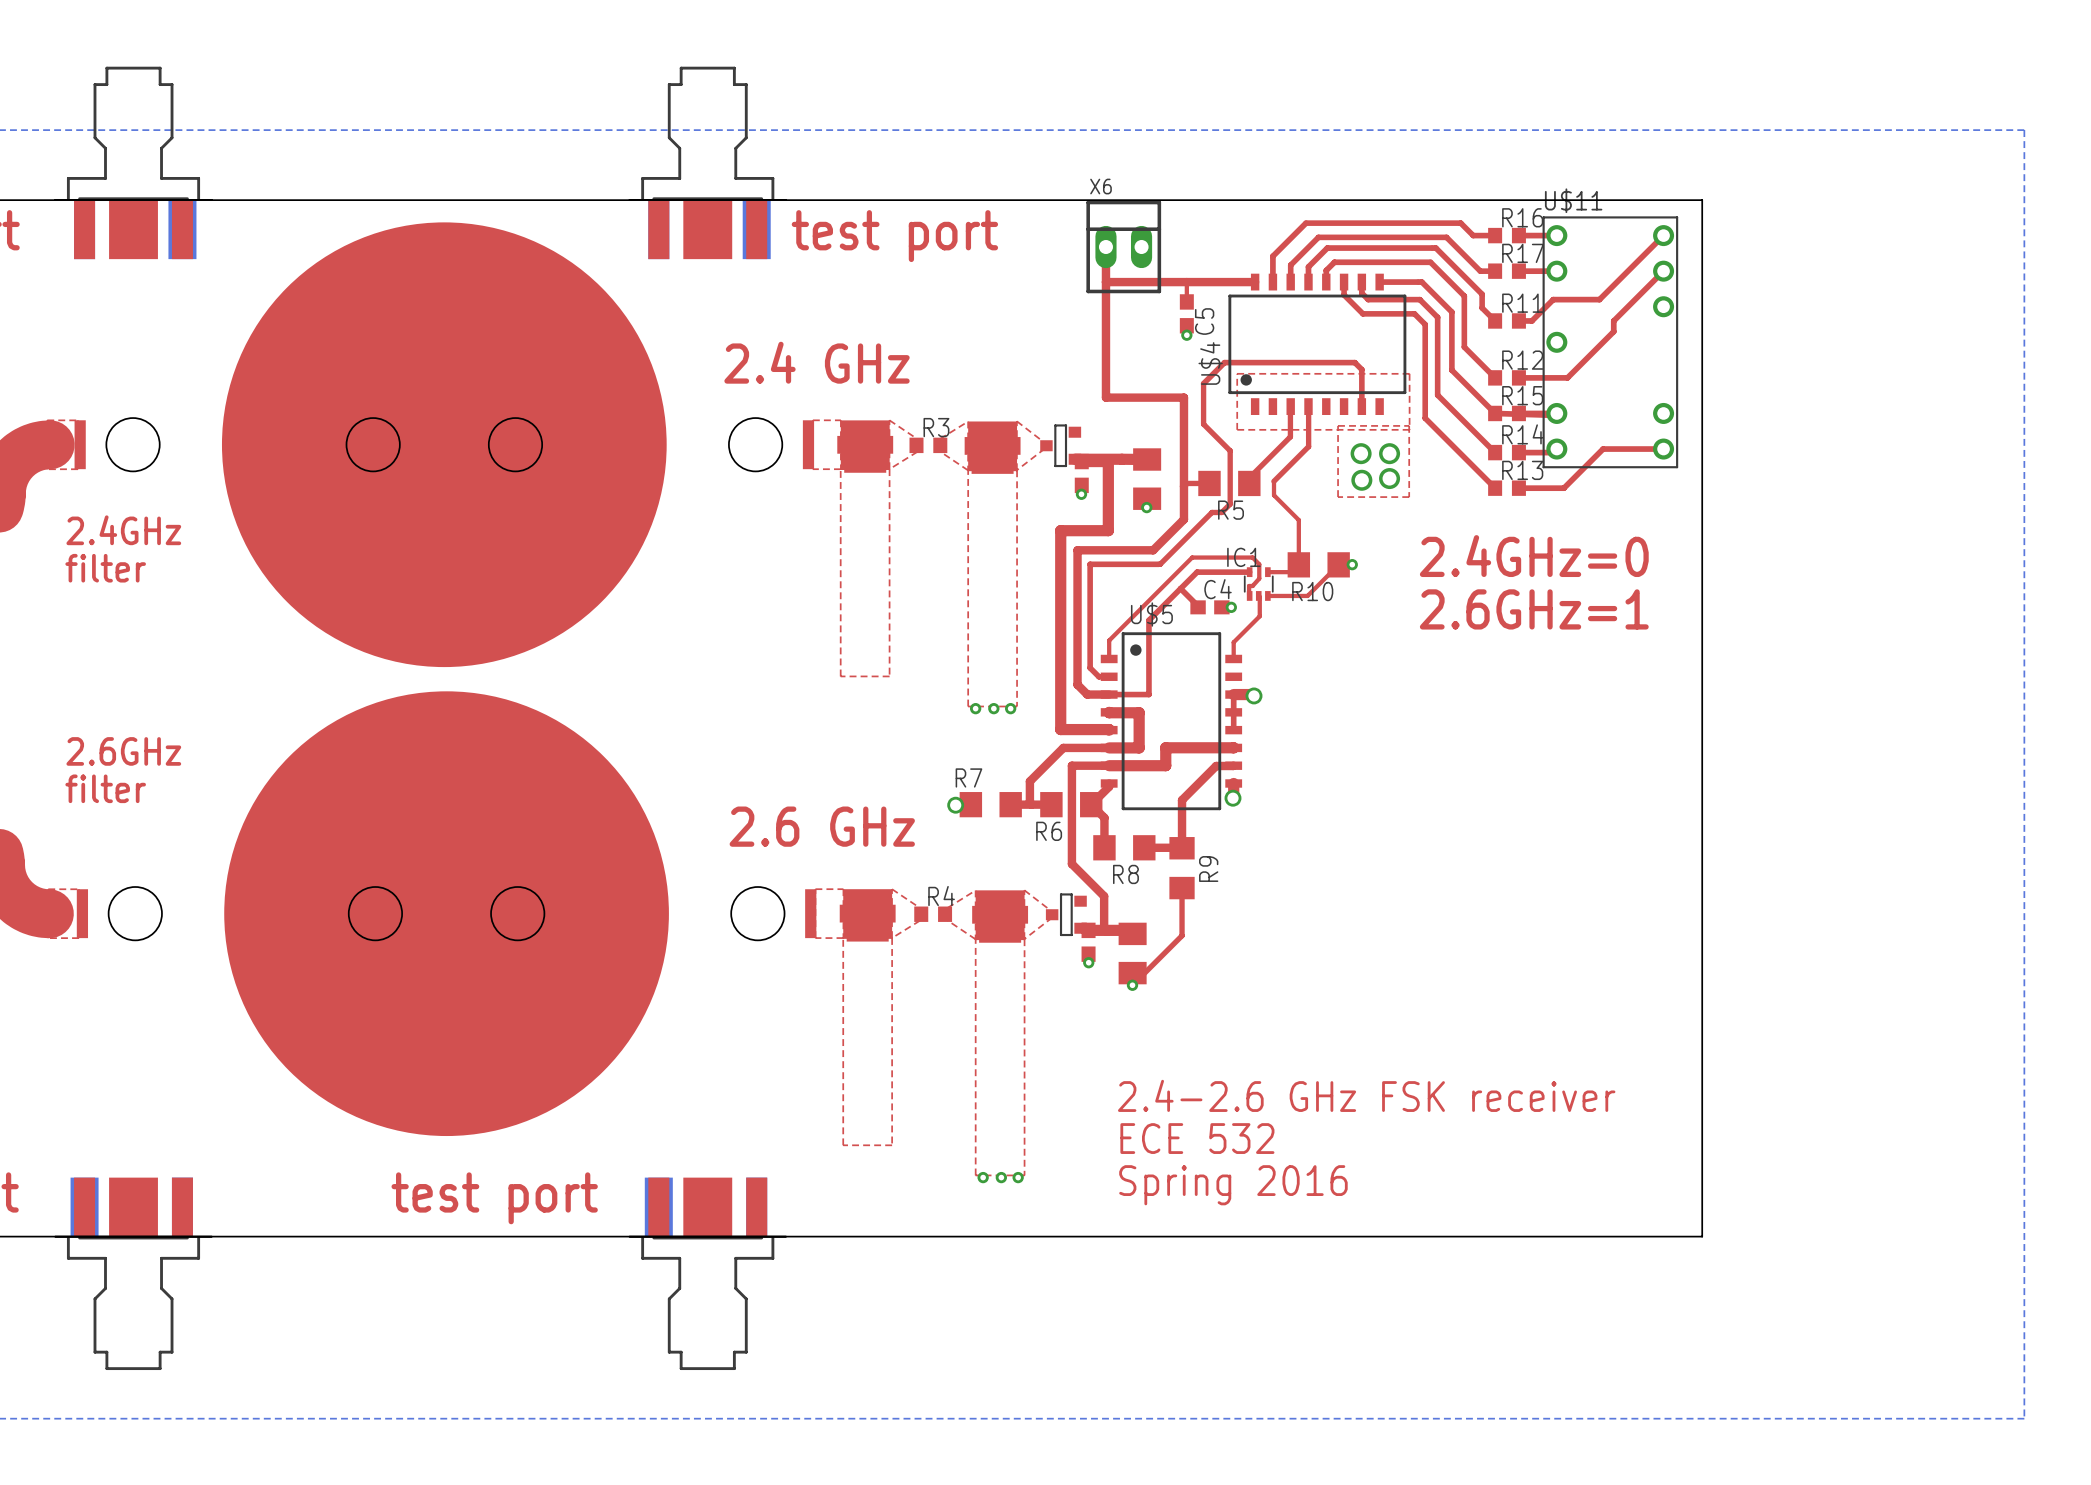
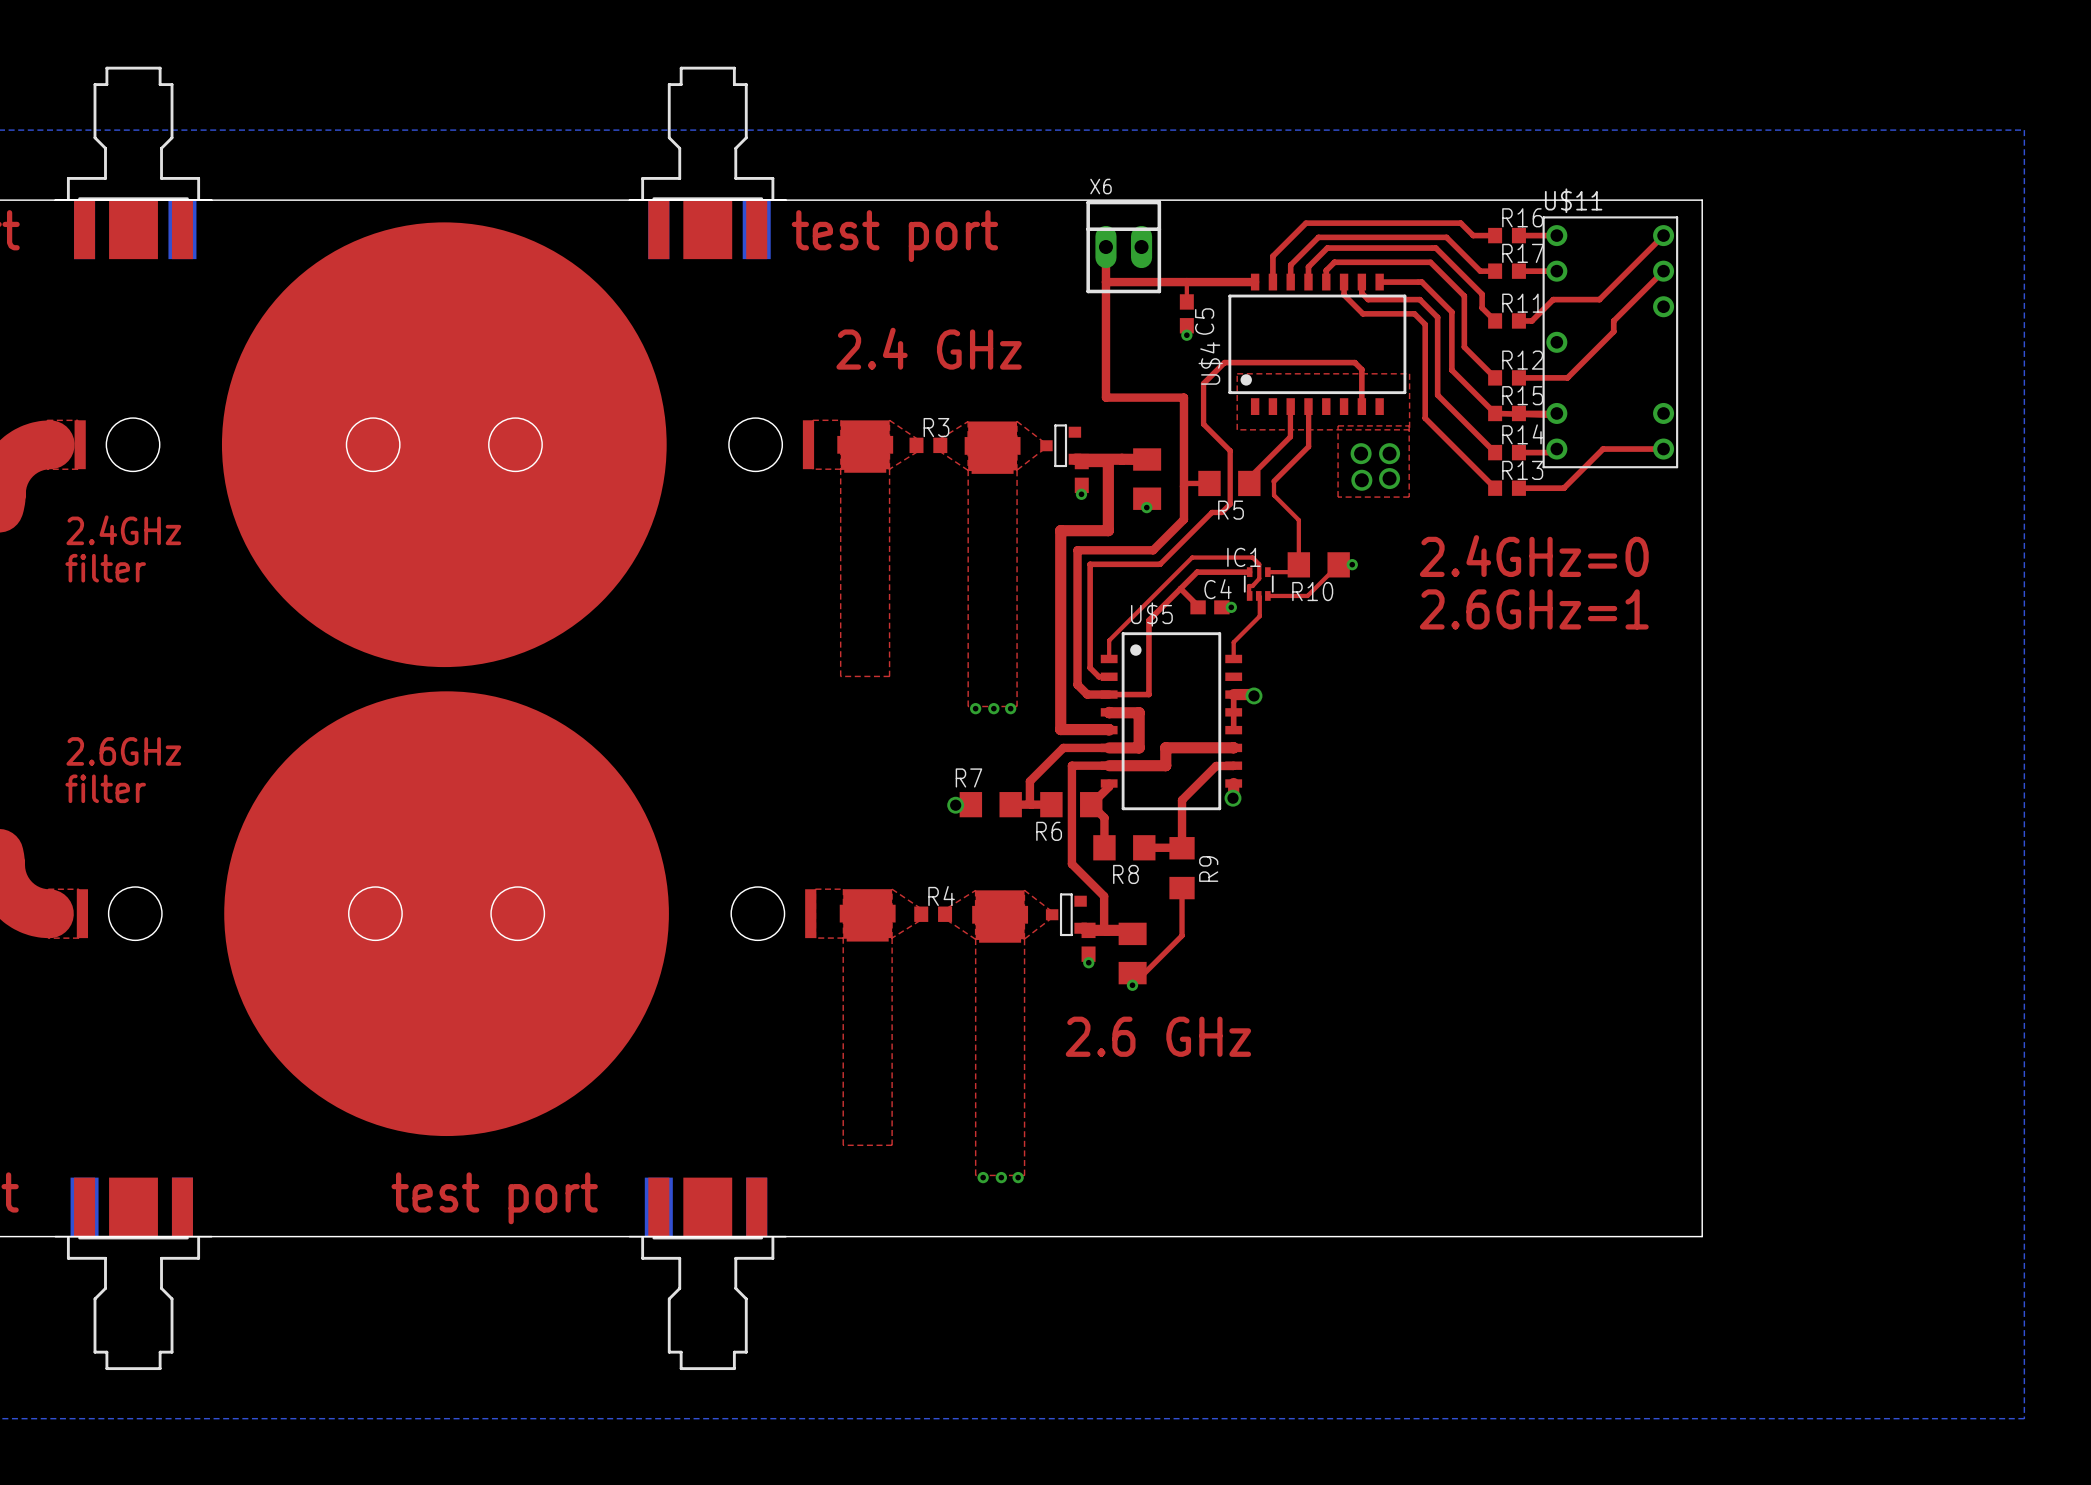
text position: 2.4 GHz (817, 362) -> 2.4 GHz (929, 348)
text: 2.6 GHz (822, 826) -> none
text: none -> 2.6 GHz (1158, 1036)
text: 2.4-2.6 GHz FSK receiver (1366, 1095) -> none
text: ECE 532 (1197, 1138) -> none
text: Spring 2016 (1233, 1185) -> none

